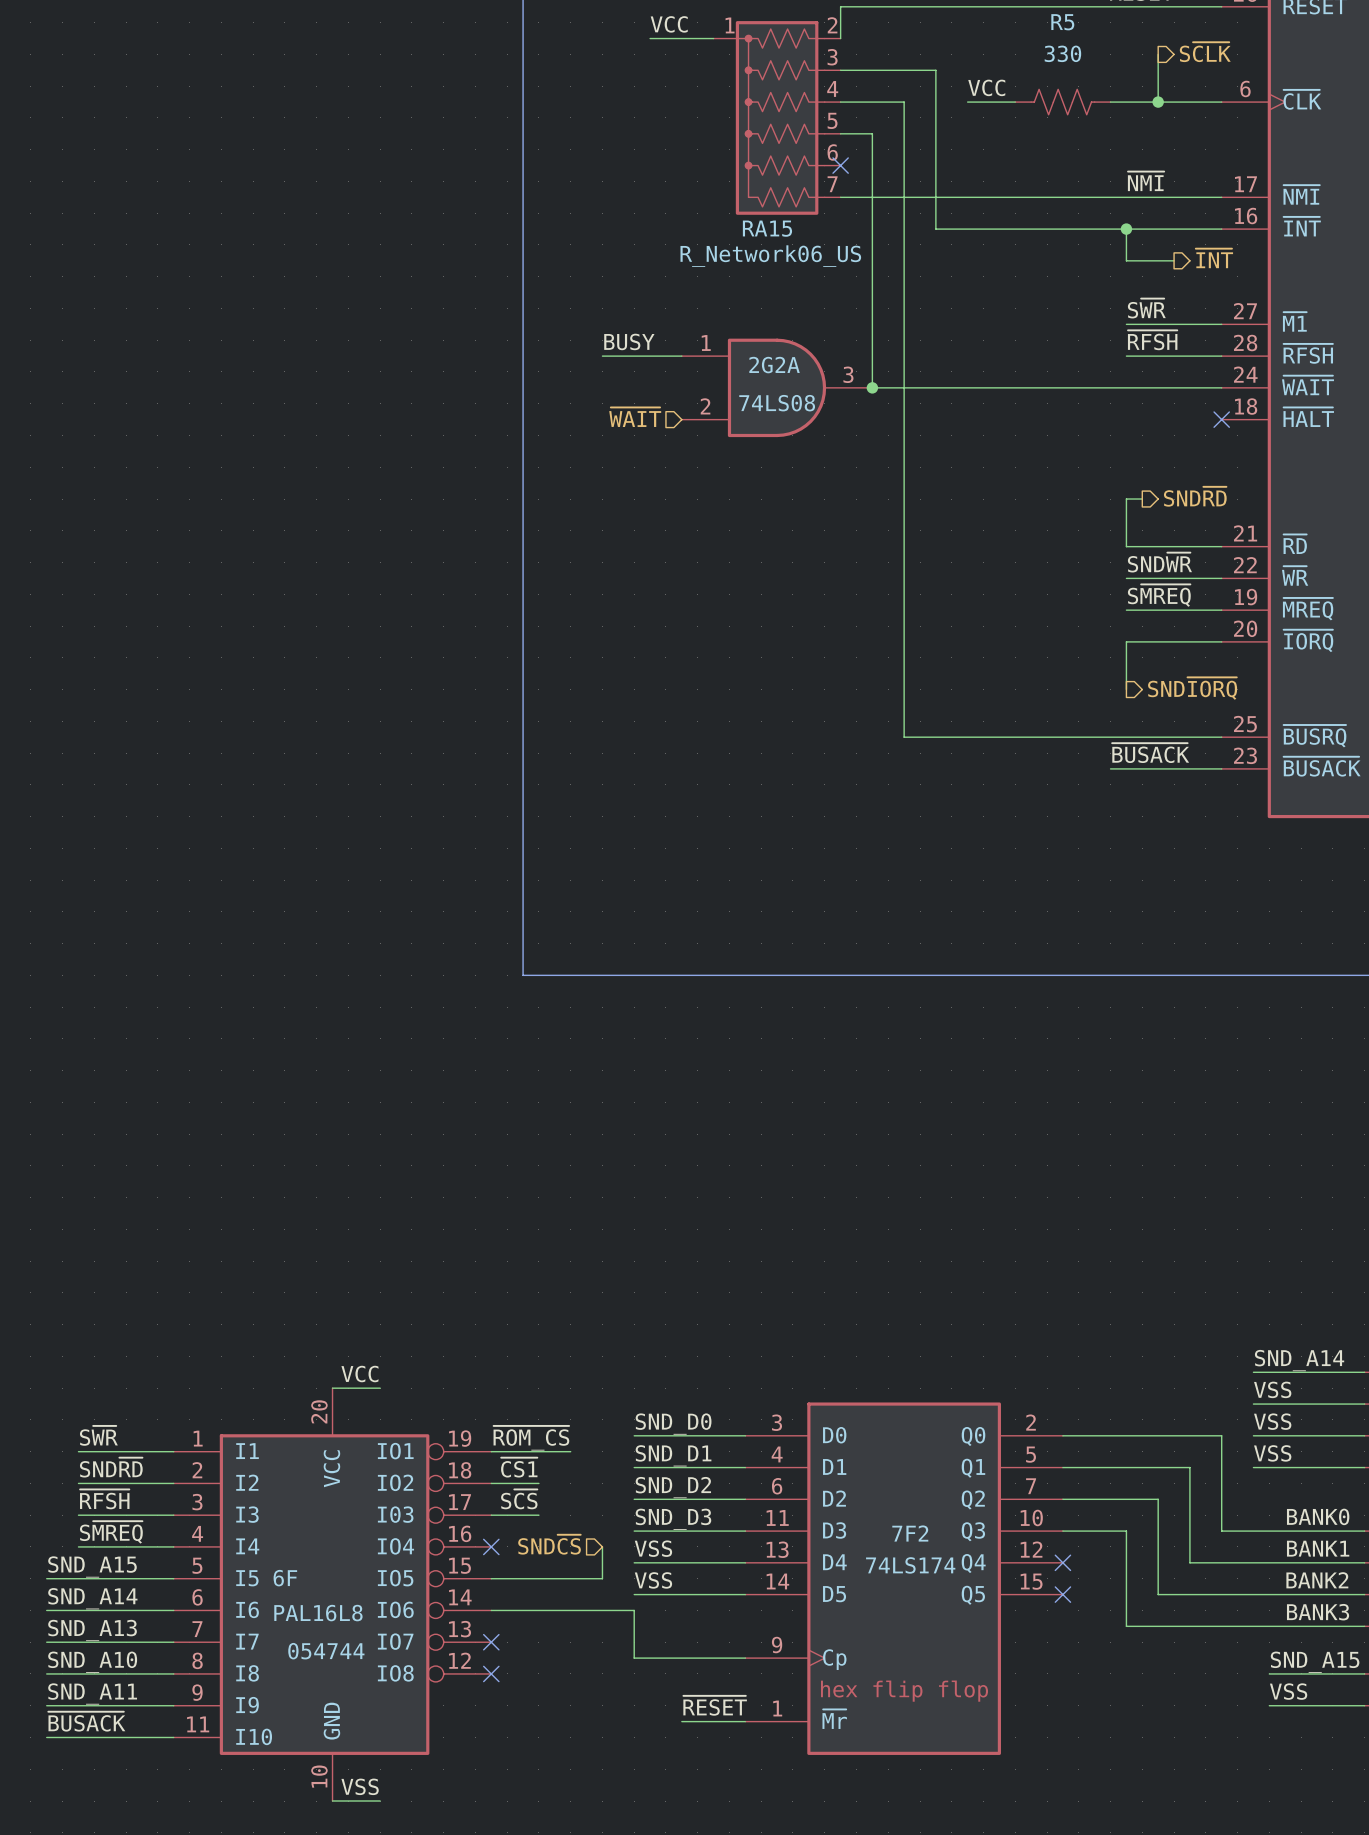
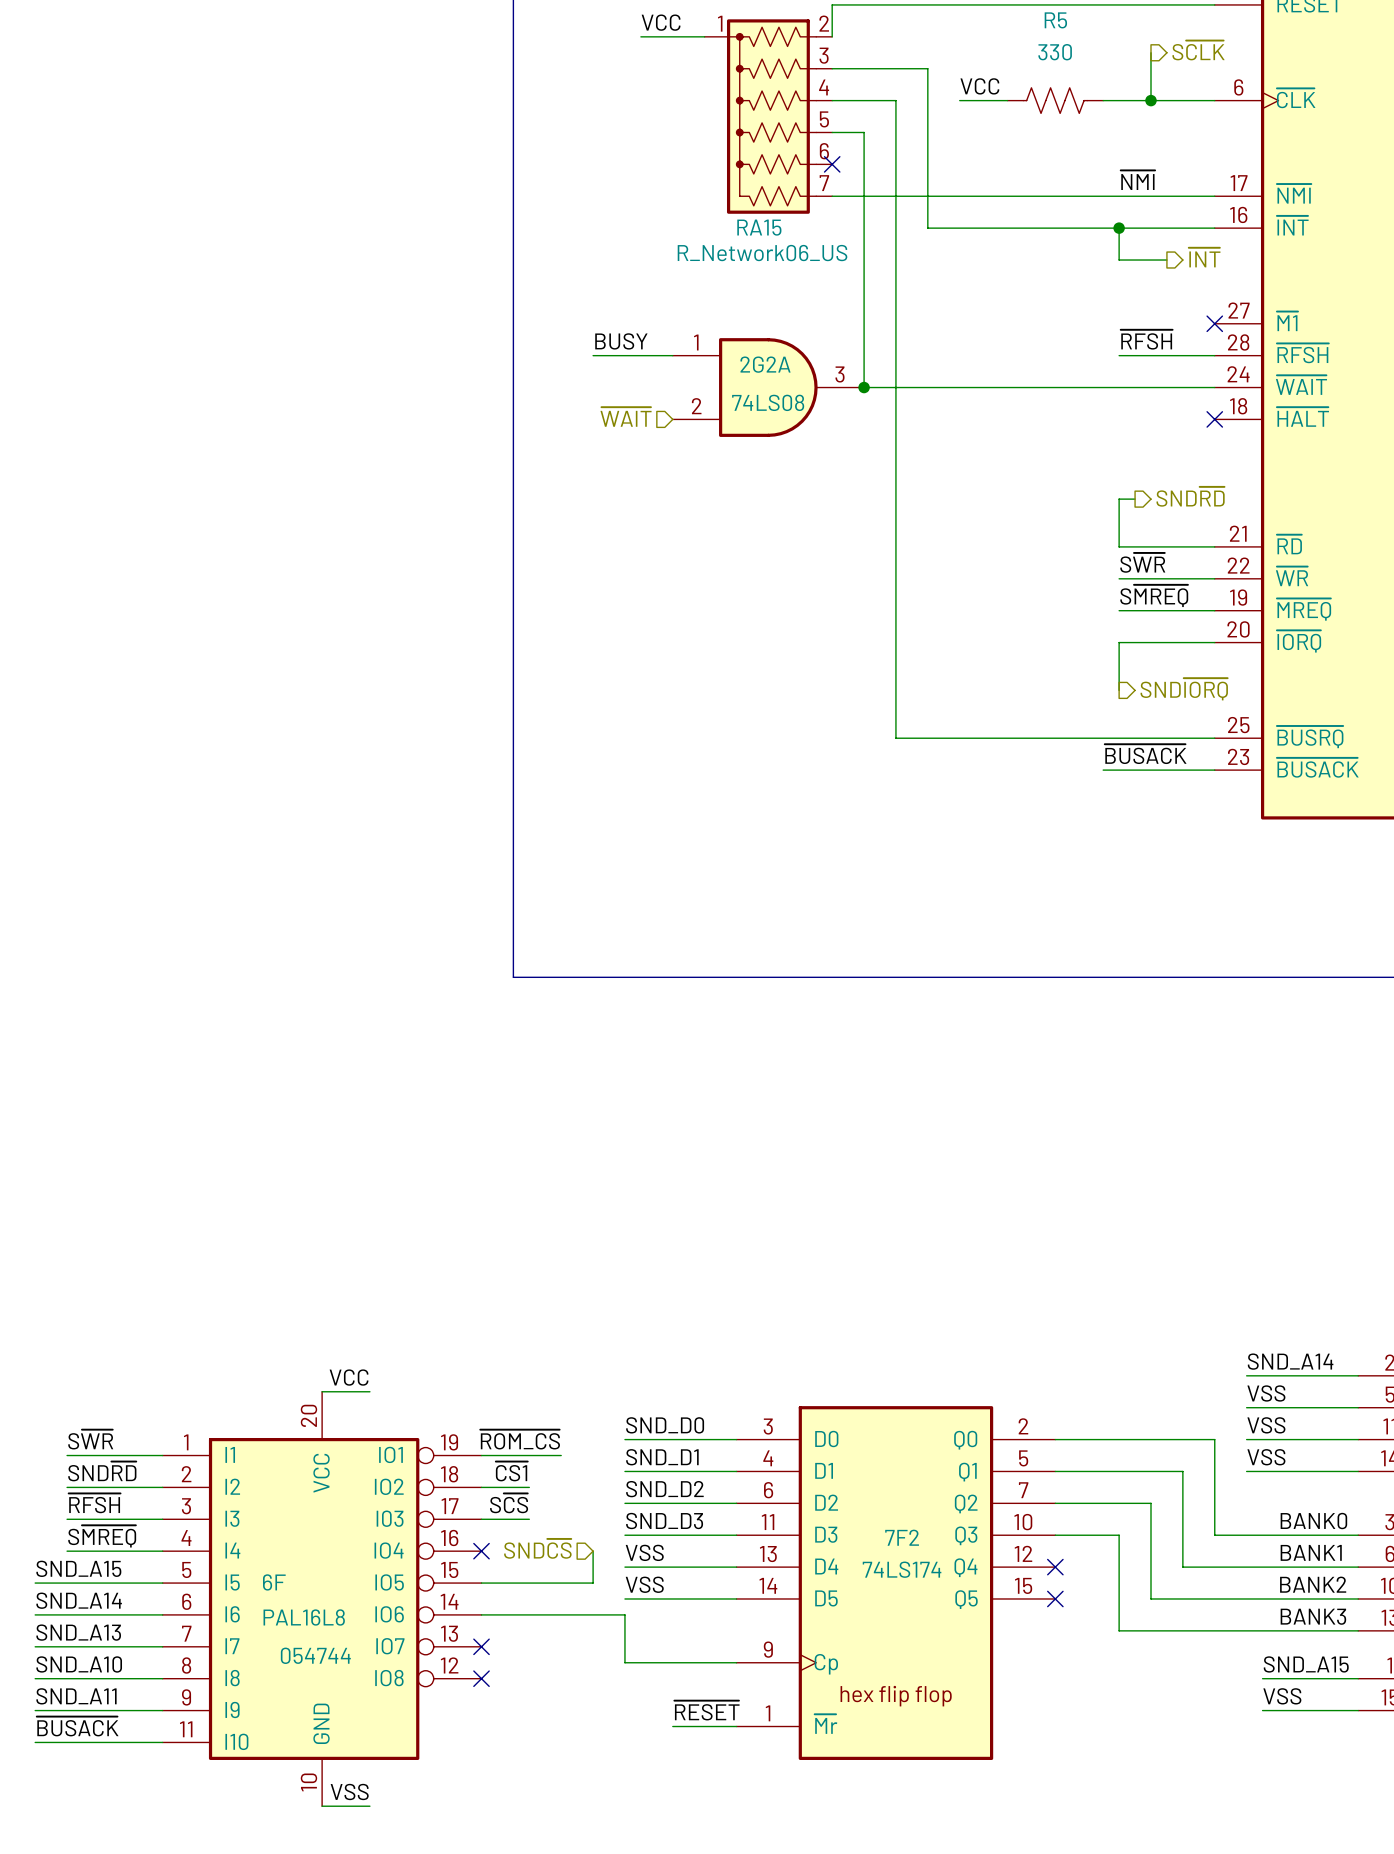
label: S~{WR} (1146, 308) -> none
wire: (1126, 324) (1221, 324) -> none
no-connect mark: none -> (1214, 323)
label: SND~{WR} (1159, 562) -> S~{WR} (1142, 562)

